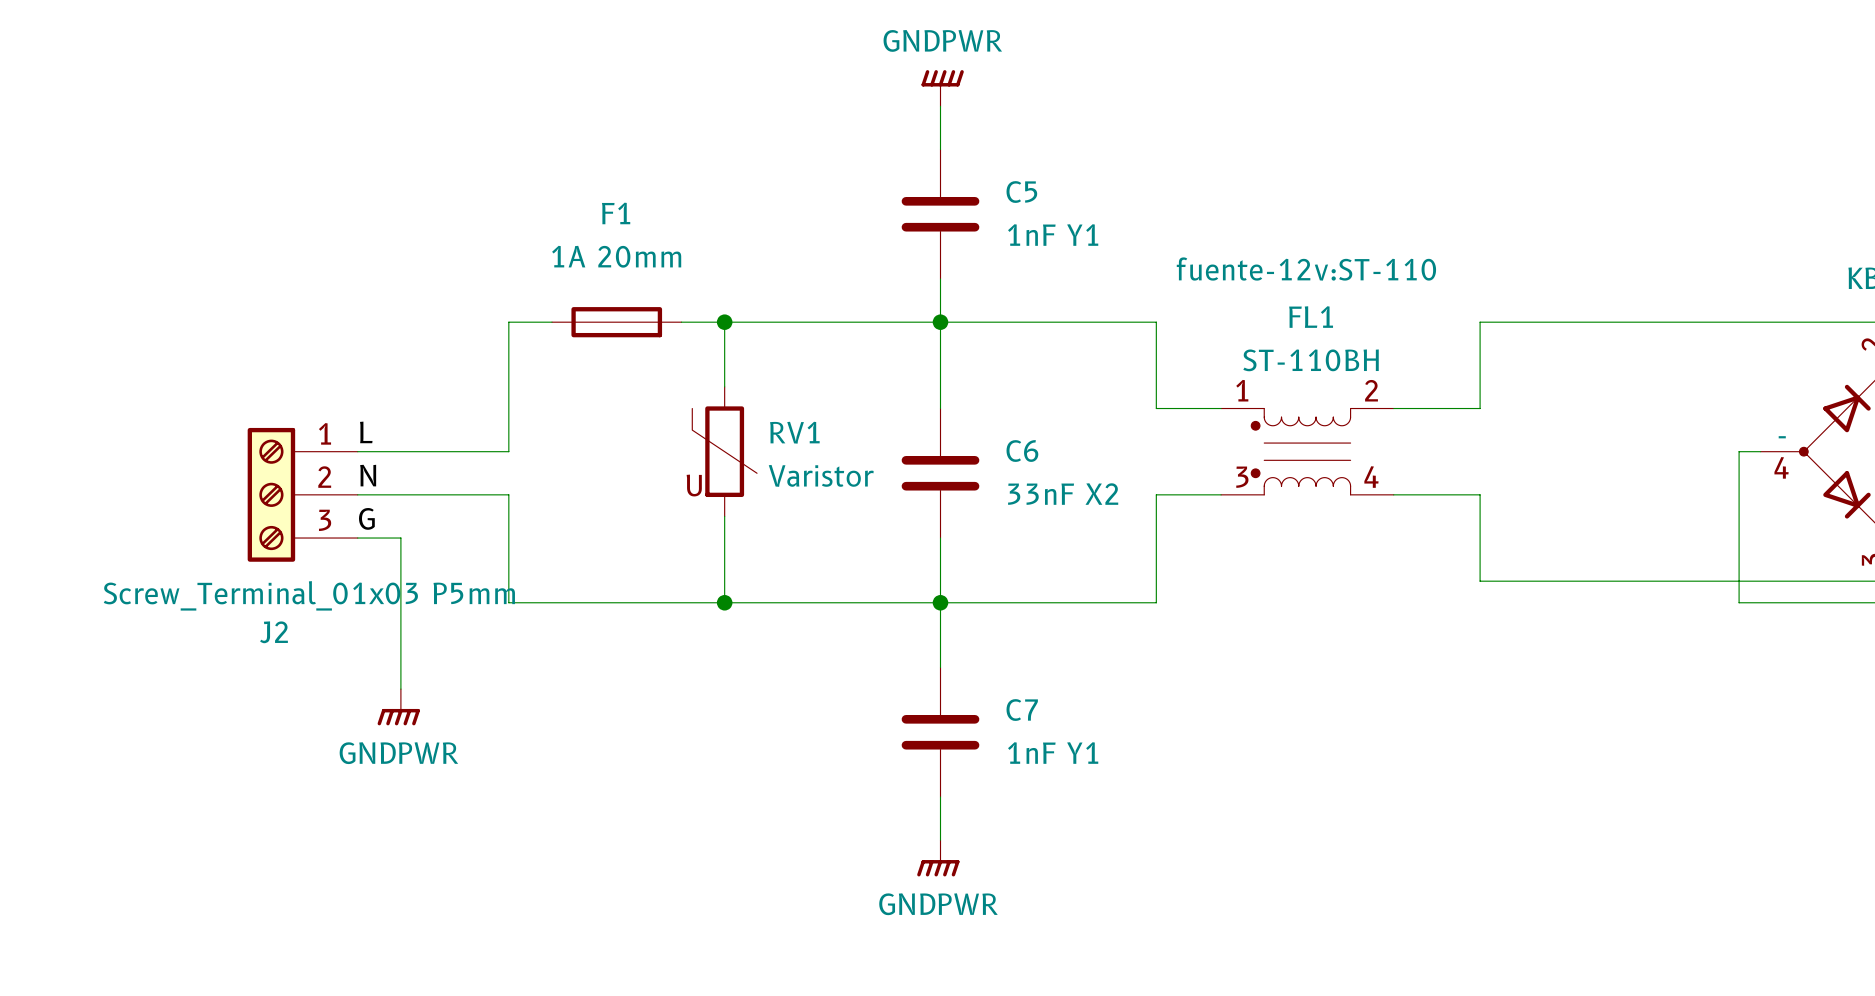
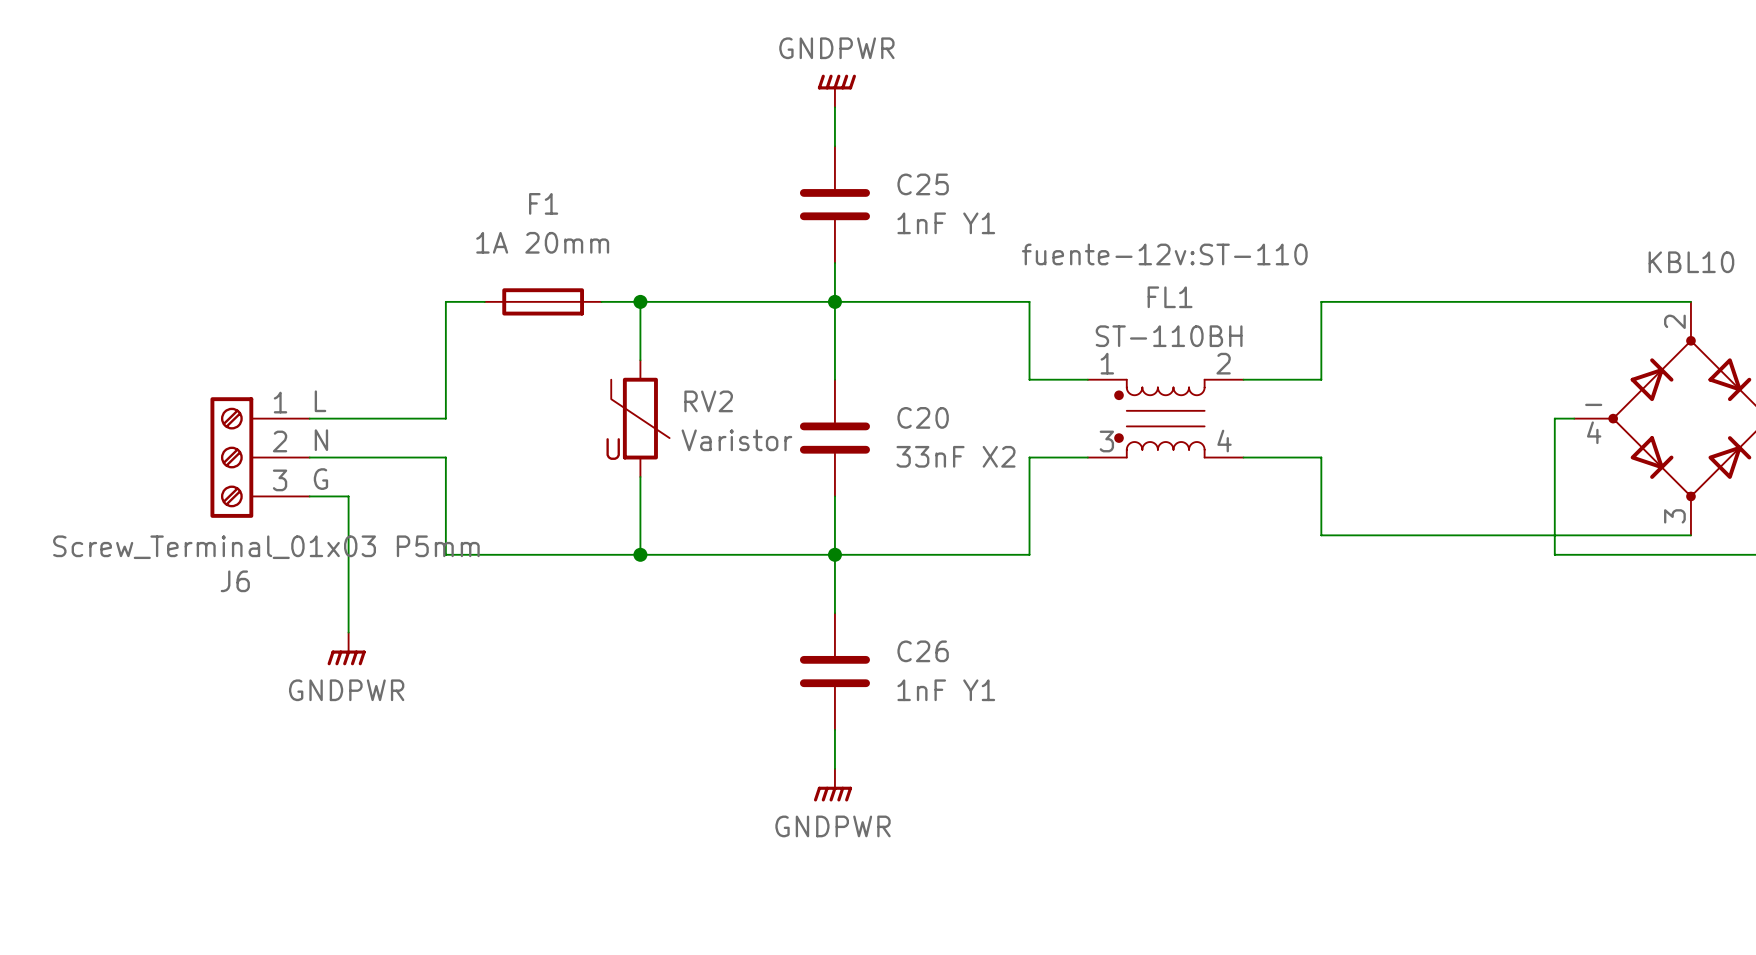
C5 name: C5 (1021, 192) -> C25 (923, 184)
RV1 name: RV1 (794, 432) -> RV2 (708, 401)
C6 name: C6 (1022, 451) -> C20 (923, 417)
J2 name: J2 (274, 632) -> J6 (235, 581)
C7 name: C7 (1022, 710) -> C26 (923, 651)

